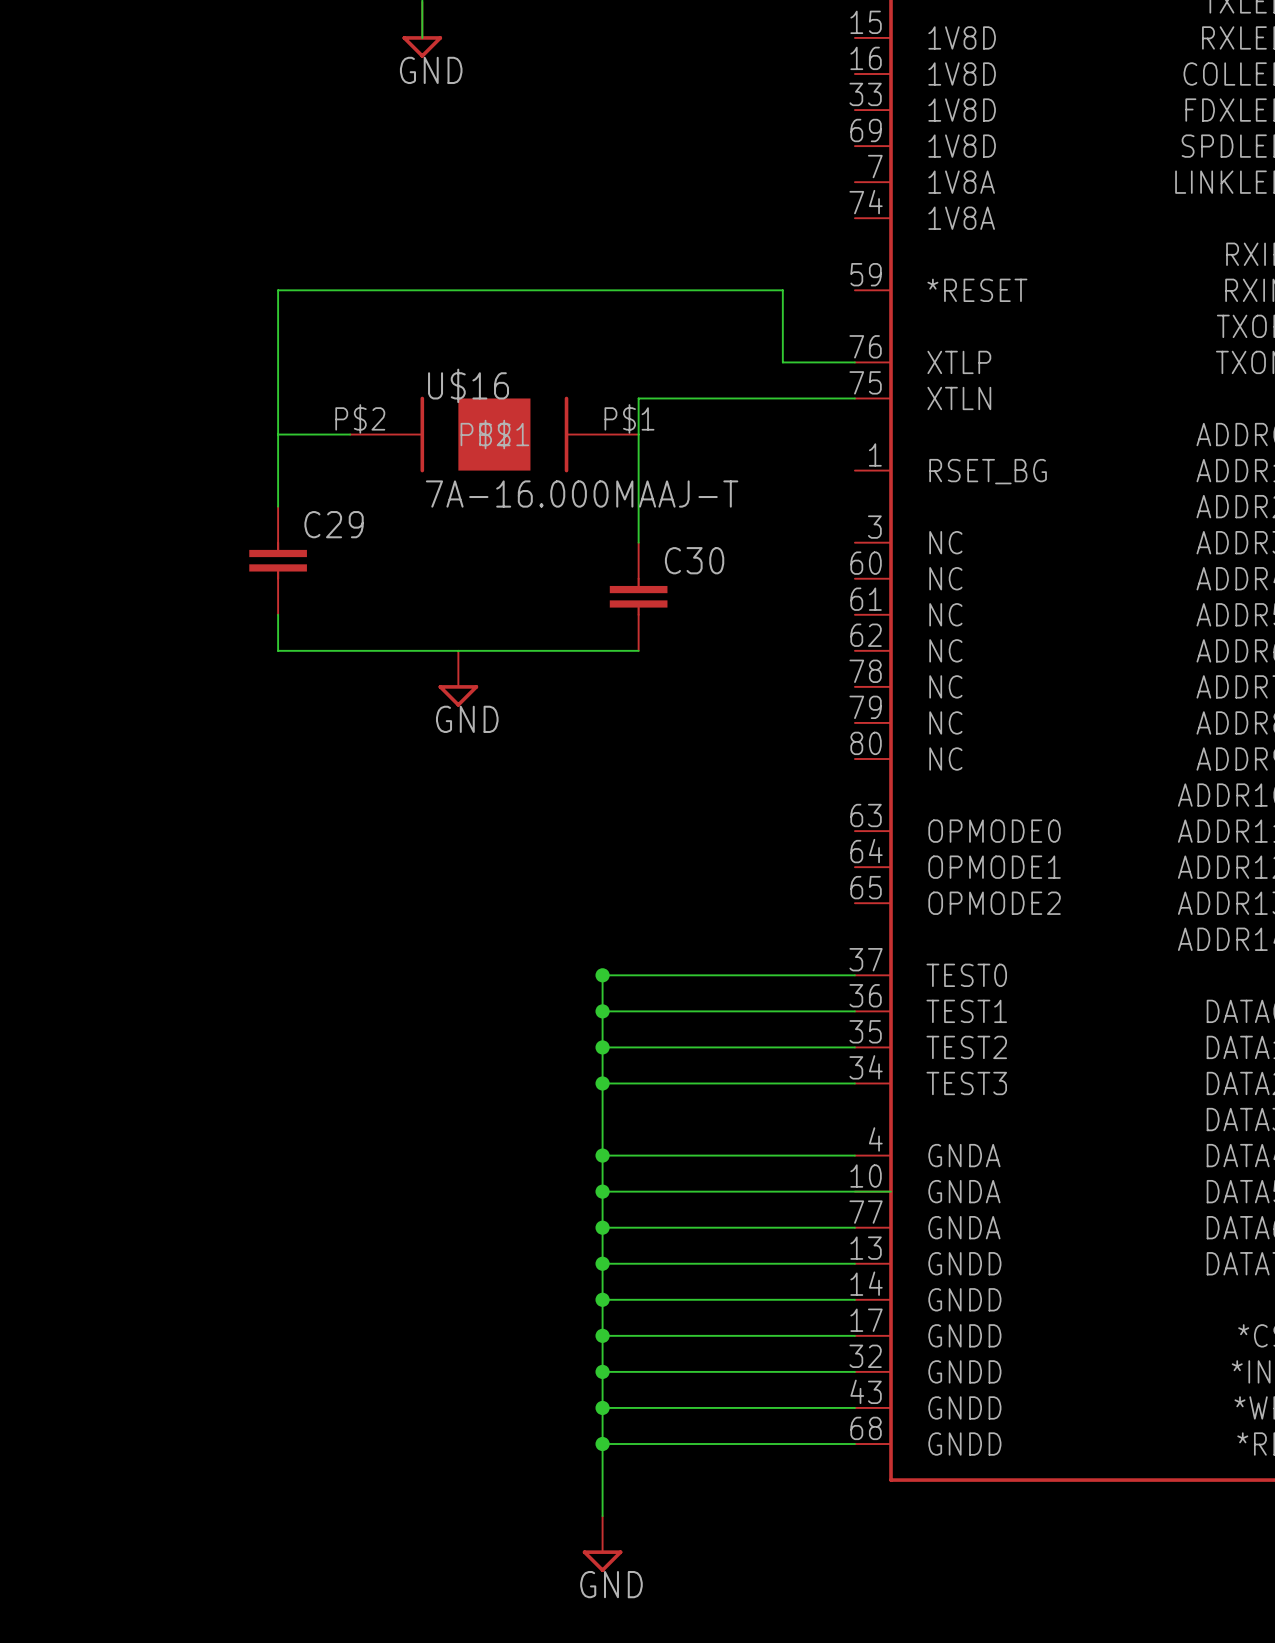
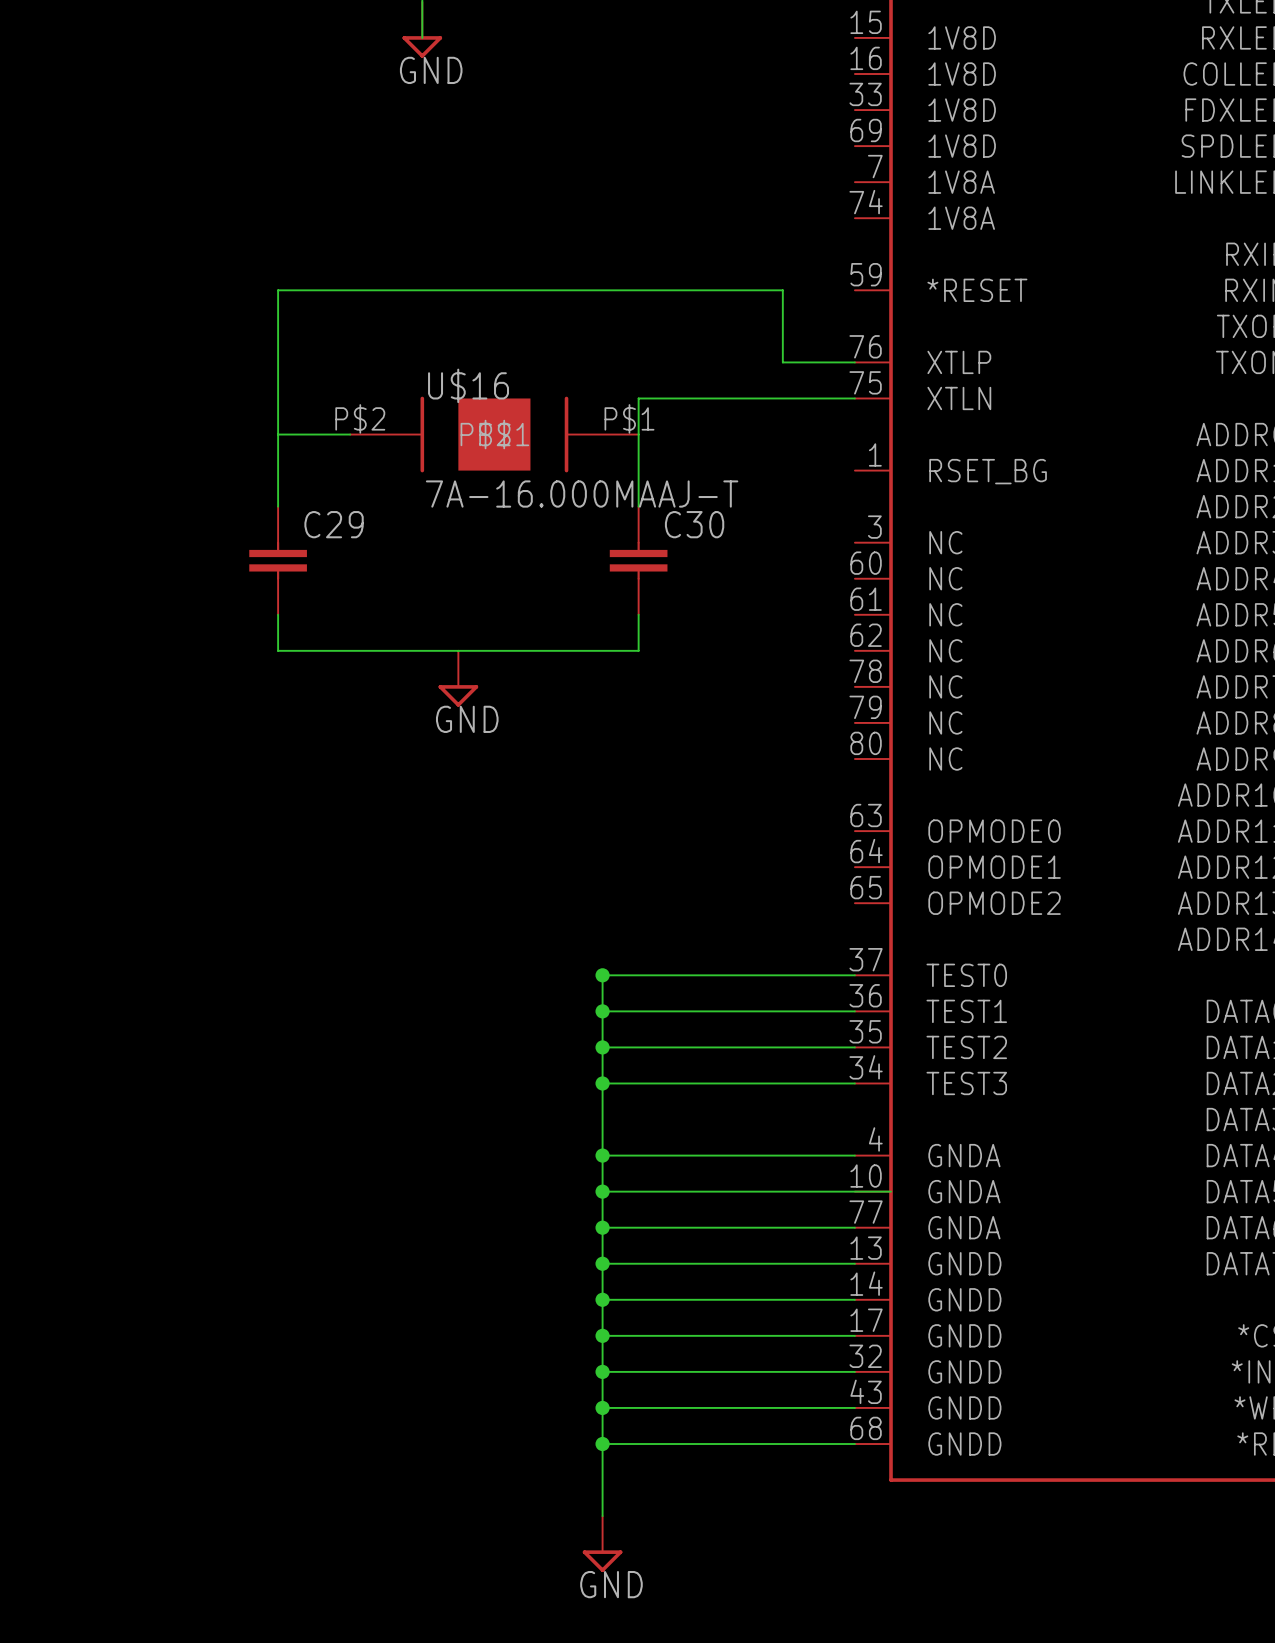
C30 position: (638, 596) -> (638, 560)

